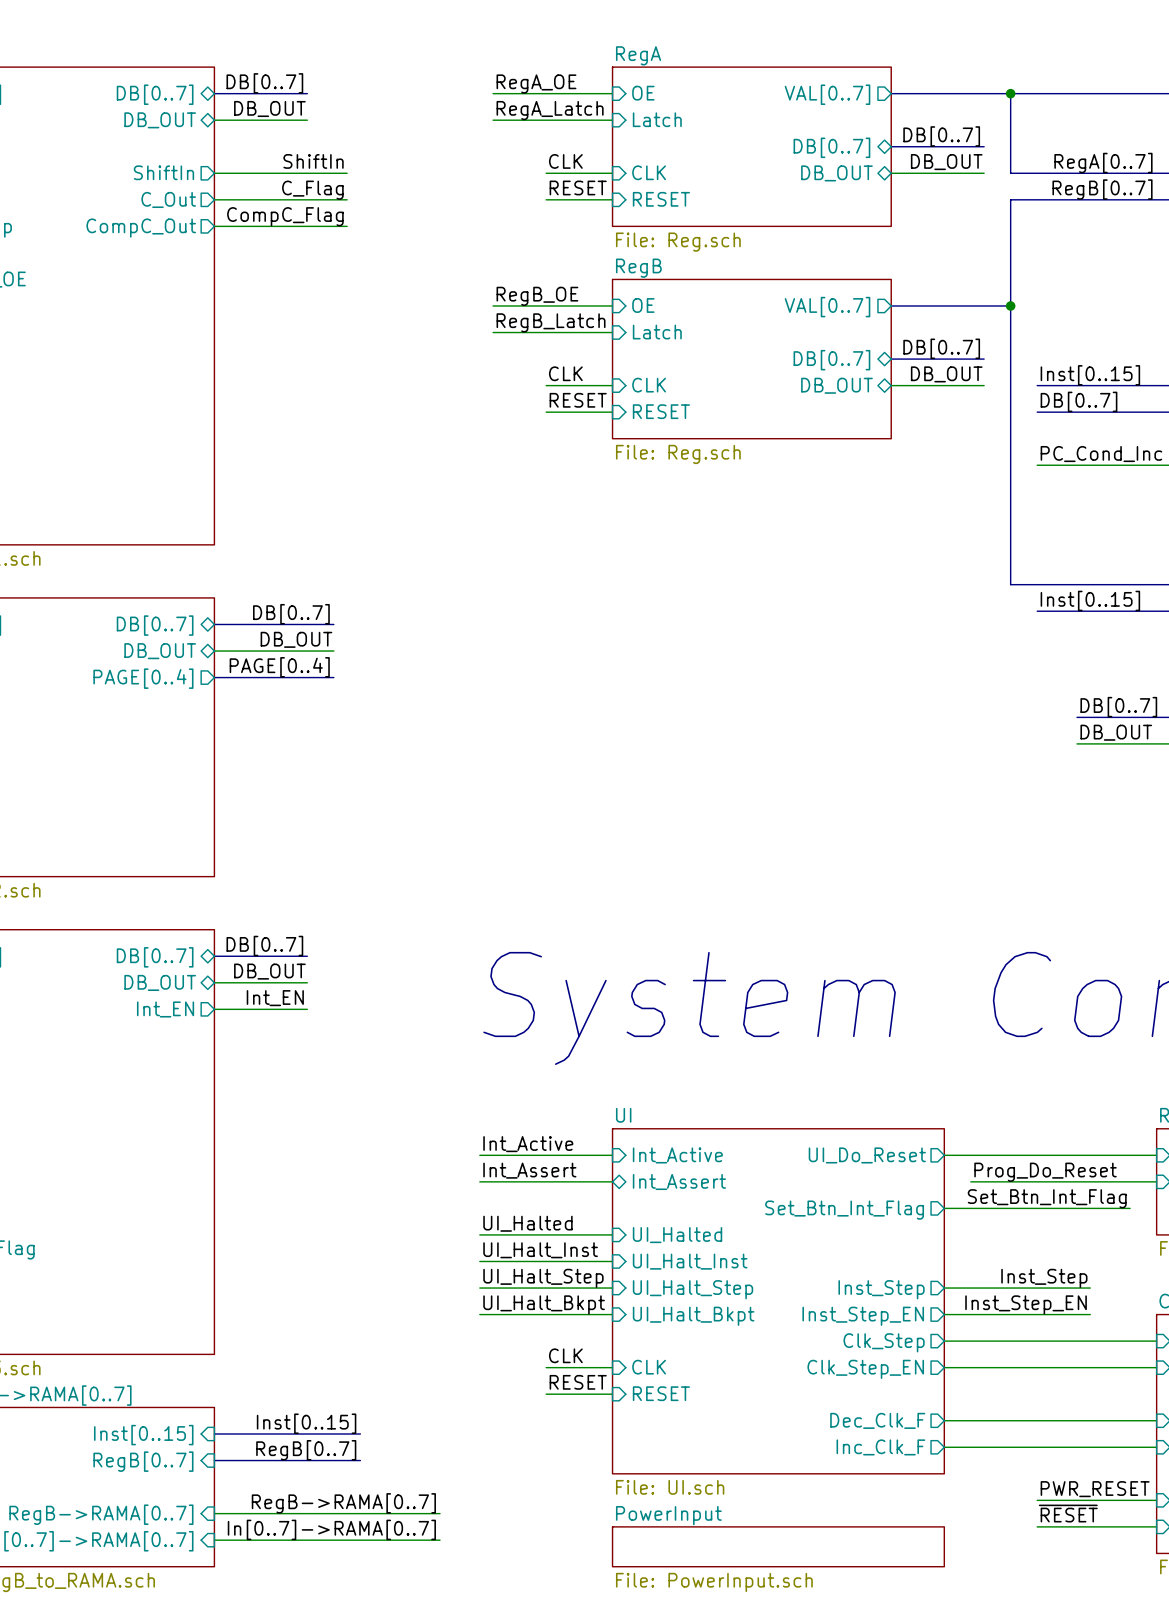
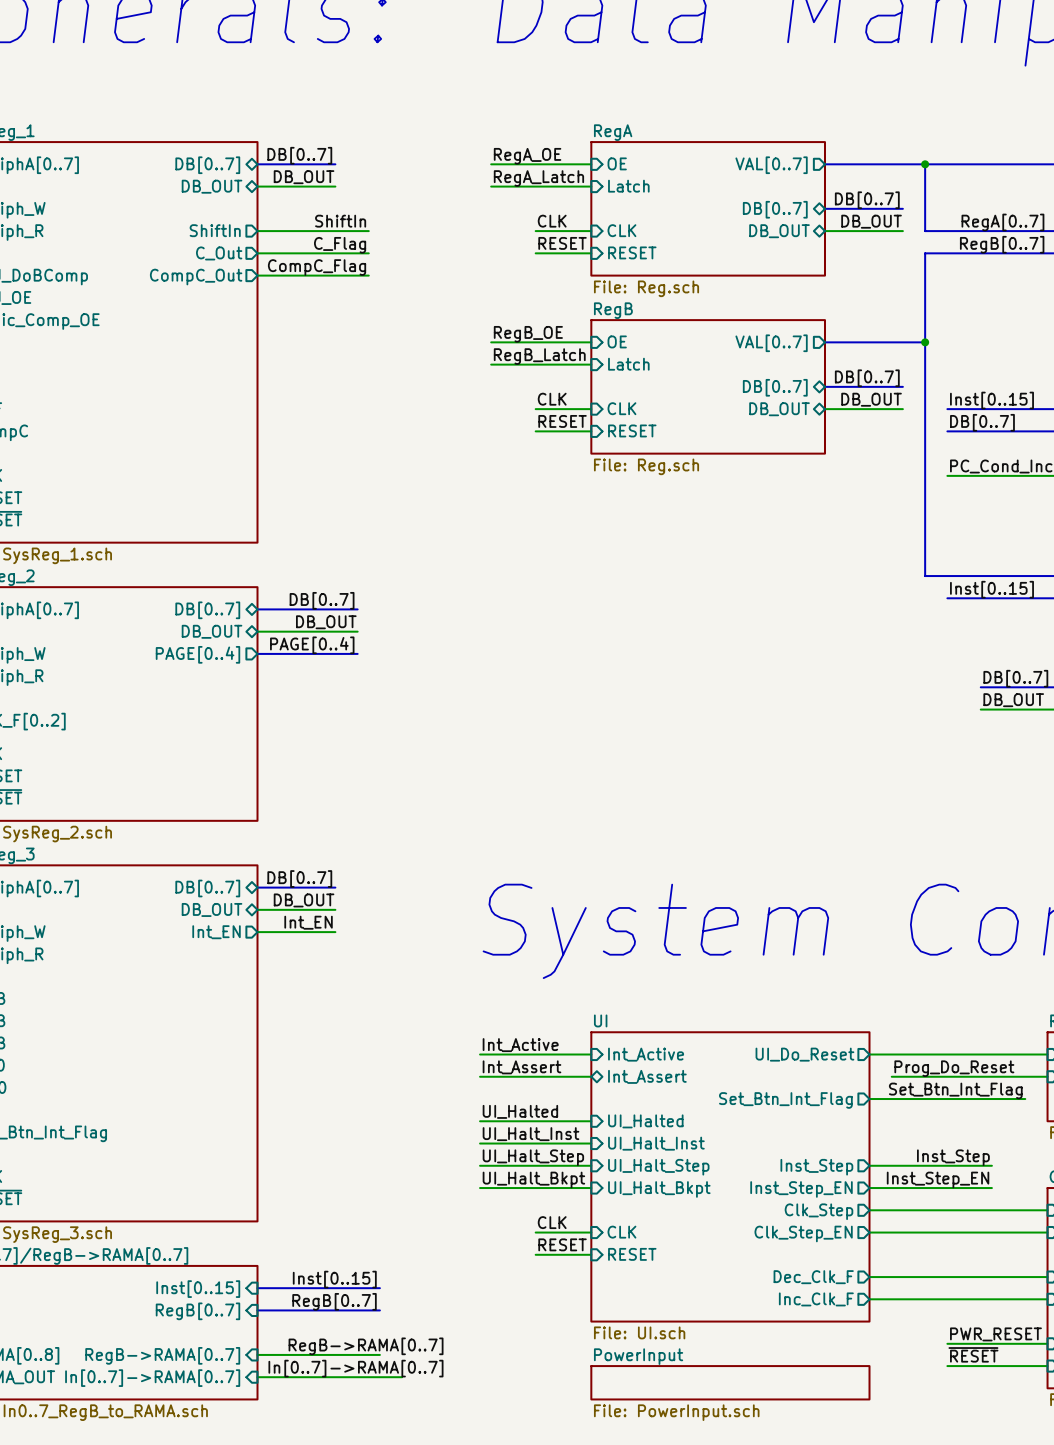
wire: (360, 1513) (440, 1513) -> none
wire: (386, 1540) (440, 1540) -> none

